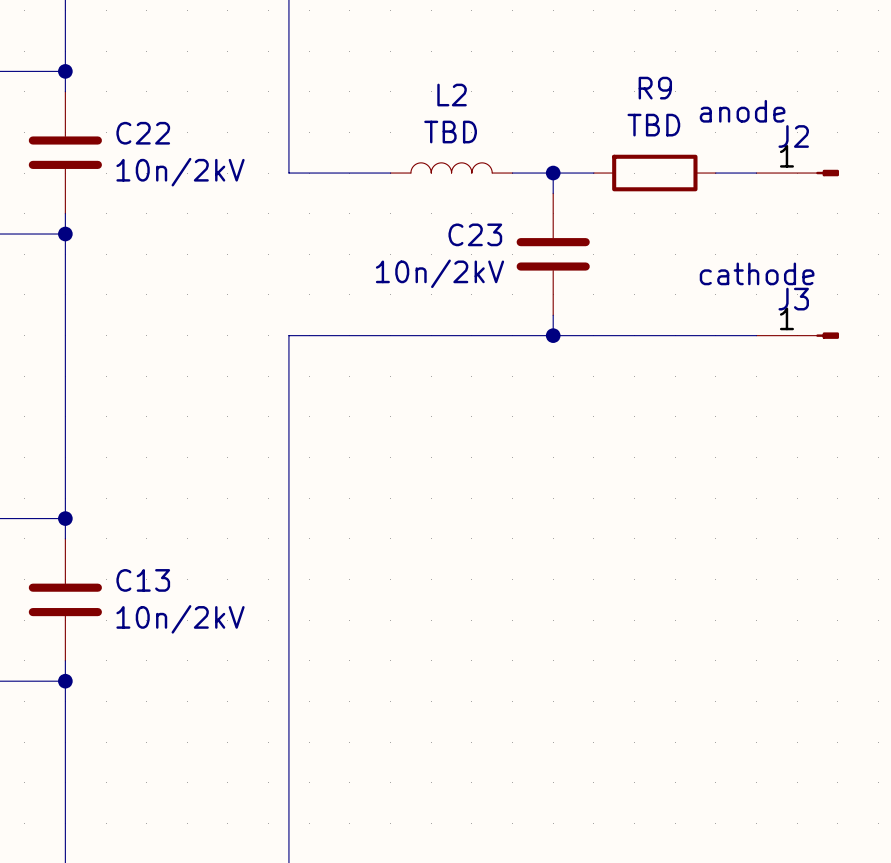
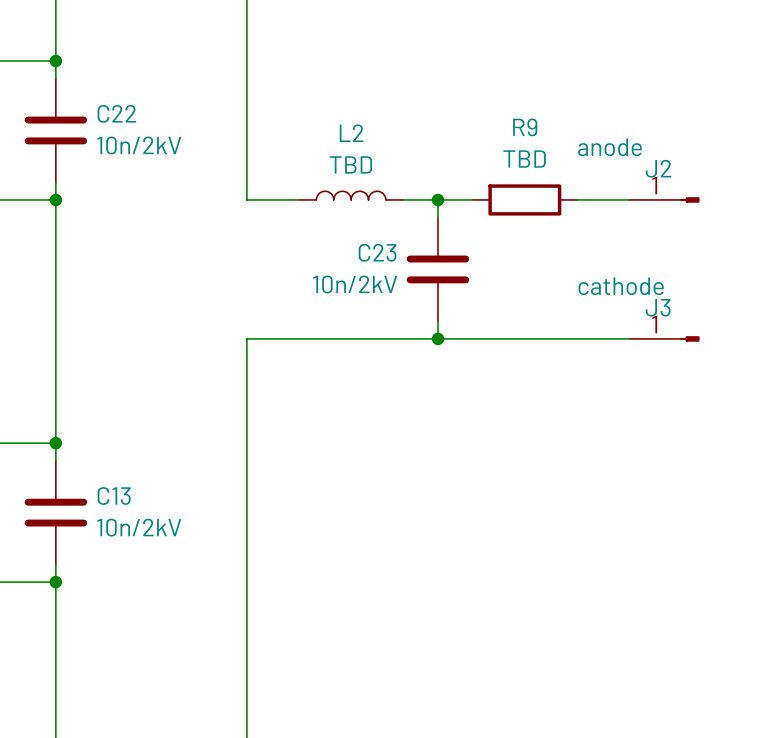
L2 position: (451, 167) -> (351, 195)
wire: (288, 173) (390, 173) -> (246, 147) (246, 199) (299, 199)
wire: (512, 173) (593, 173) -> (403, 199) (472, 199)
wire: (553, 173) (553, 193) -> (437, 199) (437, 217)
junction: (553, 173) -> none
R9 position: (654, 173) -> (524, 199)
wire: (715, 173) (756, 173) -> none
J2 position: (797, 173) -> (664, 199)
junction: none -> (437, 199)
wire: none -> (576, 199) (629, 199)
C23 position: (553, 254) -> (437, 269)
wire: (553, 315) (553, 335) -> (437, 321) (437, 338)
junction: (553, 335) -> none
wire: (756, 335) (288, 335) (288, 396) -> (629, 338) (246, 338)
J3 position: (797, 335) -> (664, 338)
junction: none -> (437, 338)

